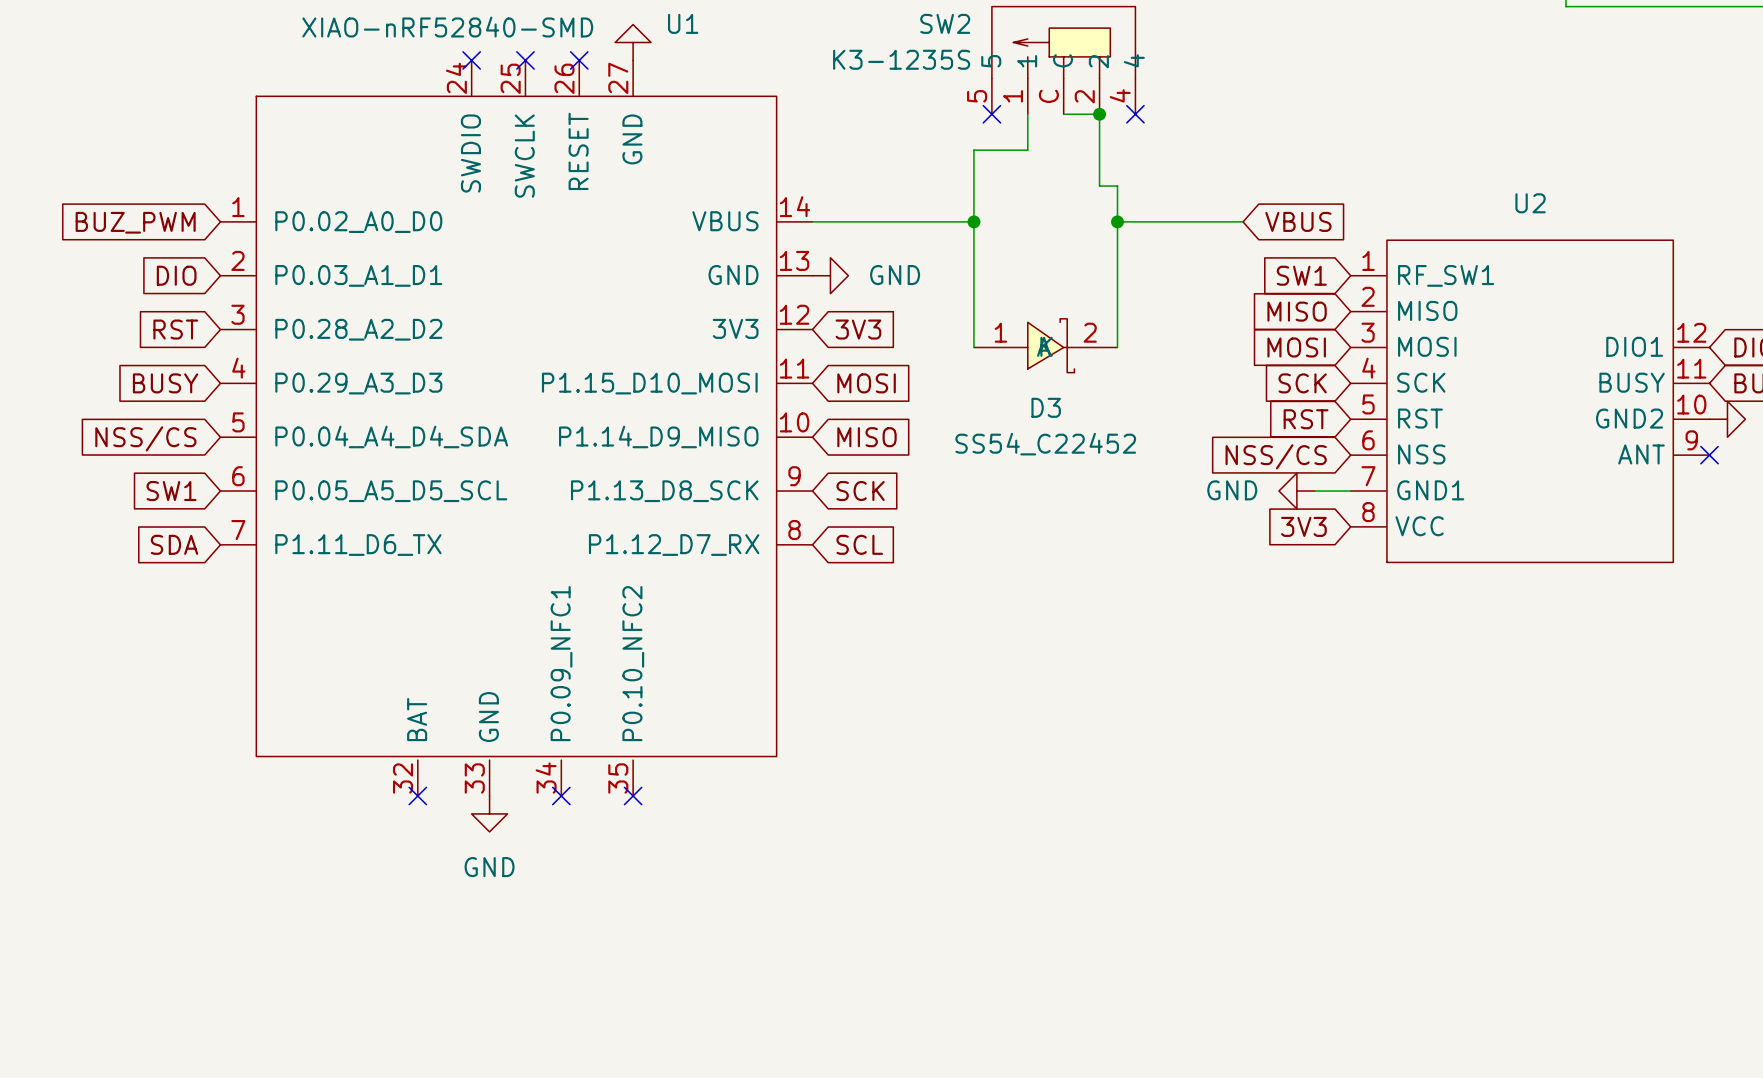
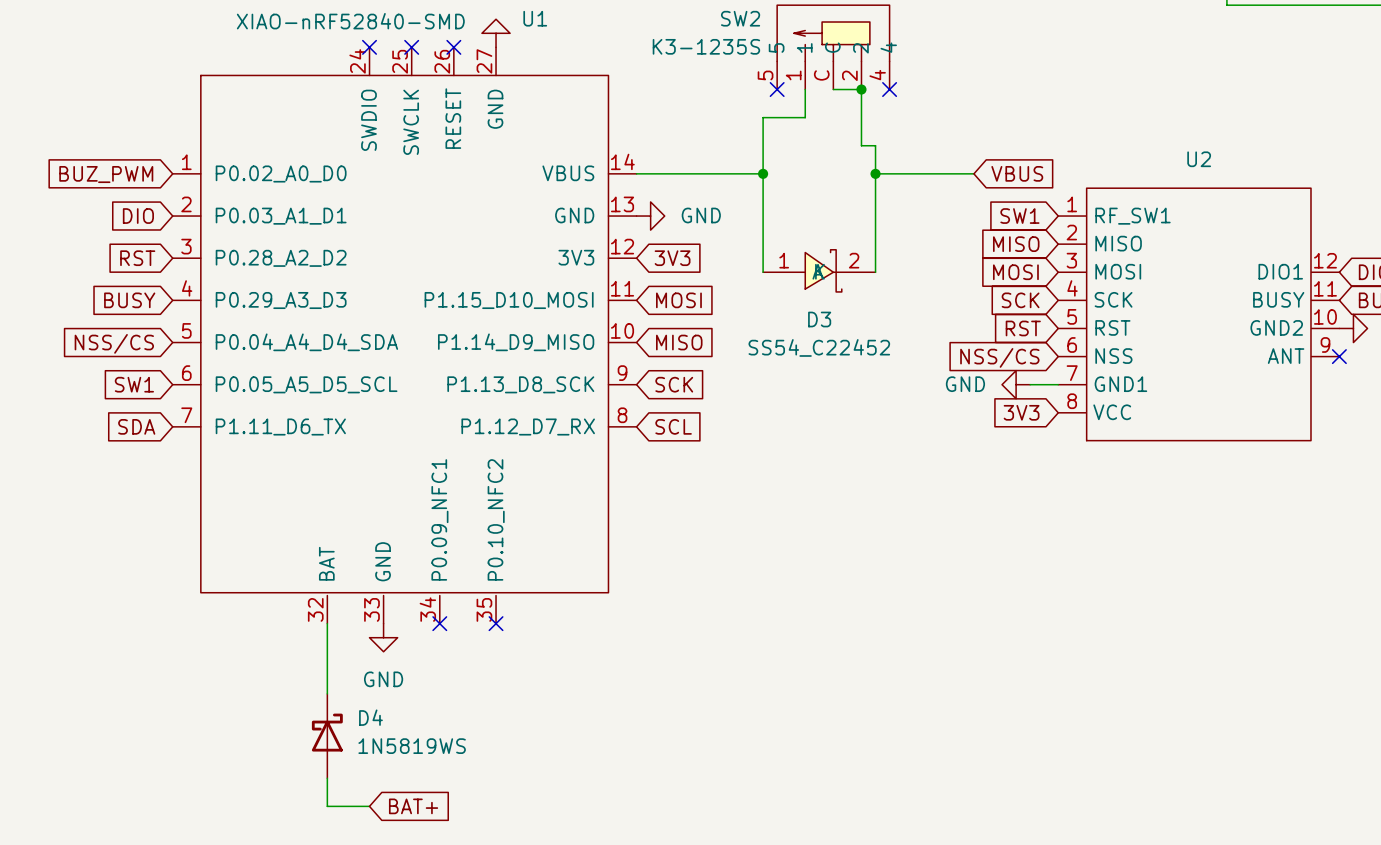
wire: none -> (327, 623) (327, 693)
no-connect mark: (417, 796) -> none
D4: none -> 1N5819WS (327, 736)
wire: none -> (327, 778) (327, 806) (369, 806)
global label: none -> BAT+ (413, 806)

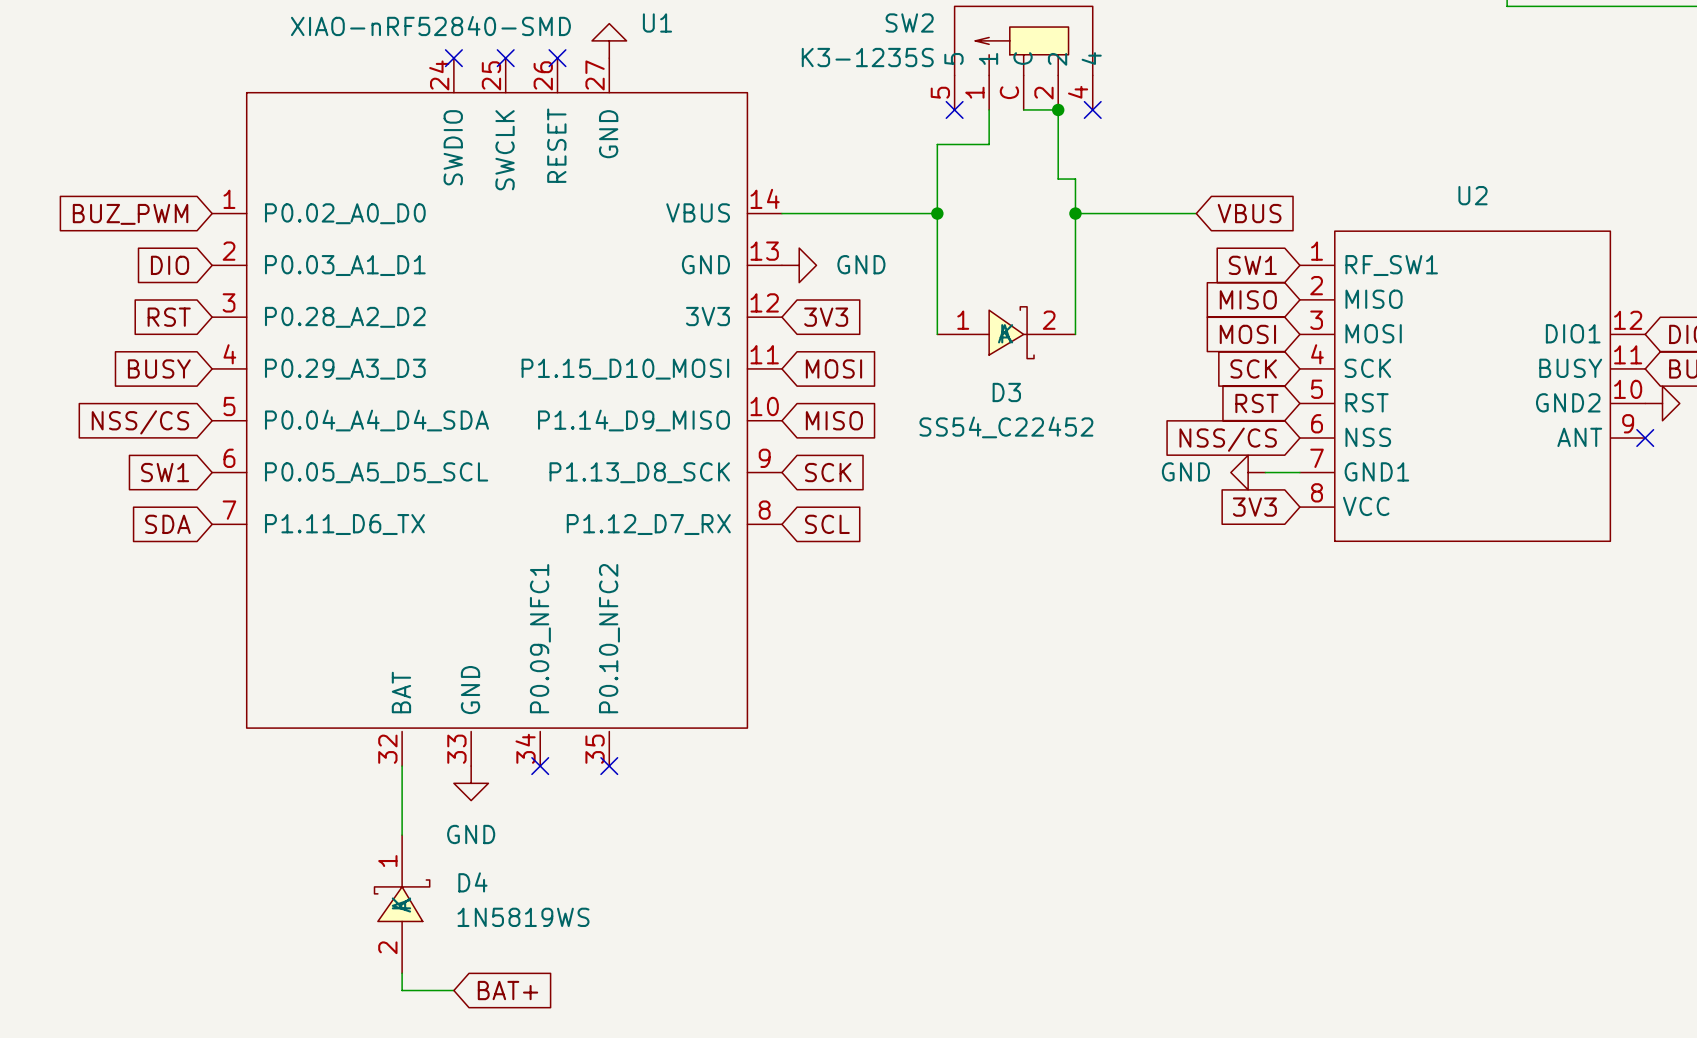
D4 symbol: [311, 693, 343, 779] -> [374, 835, 430, 974]

